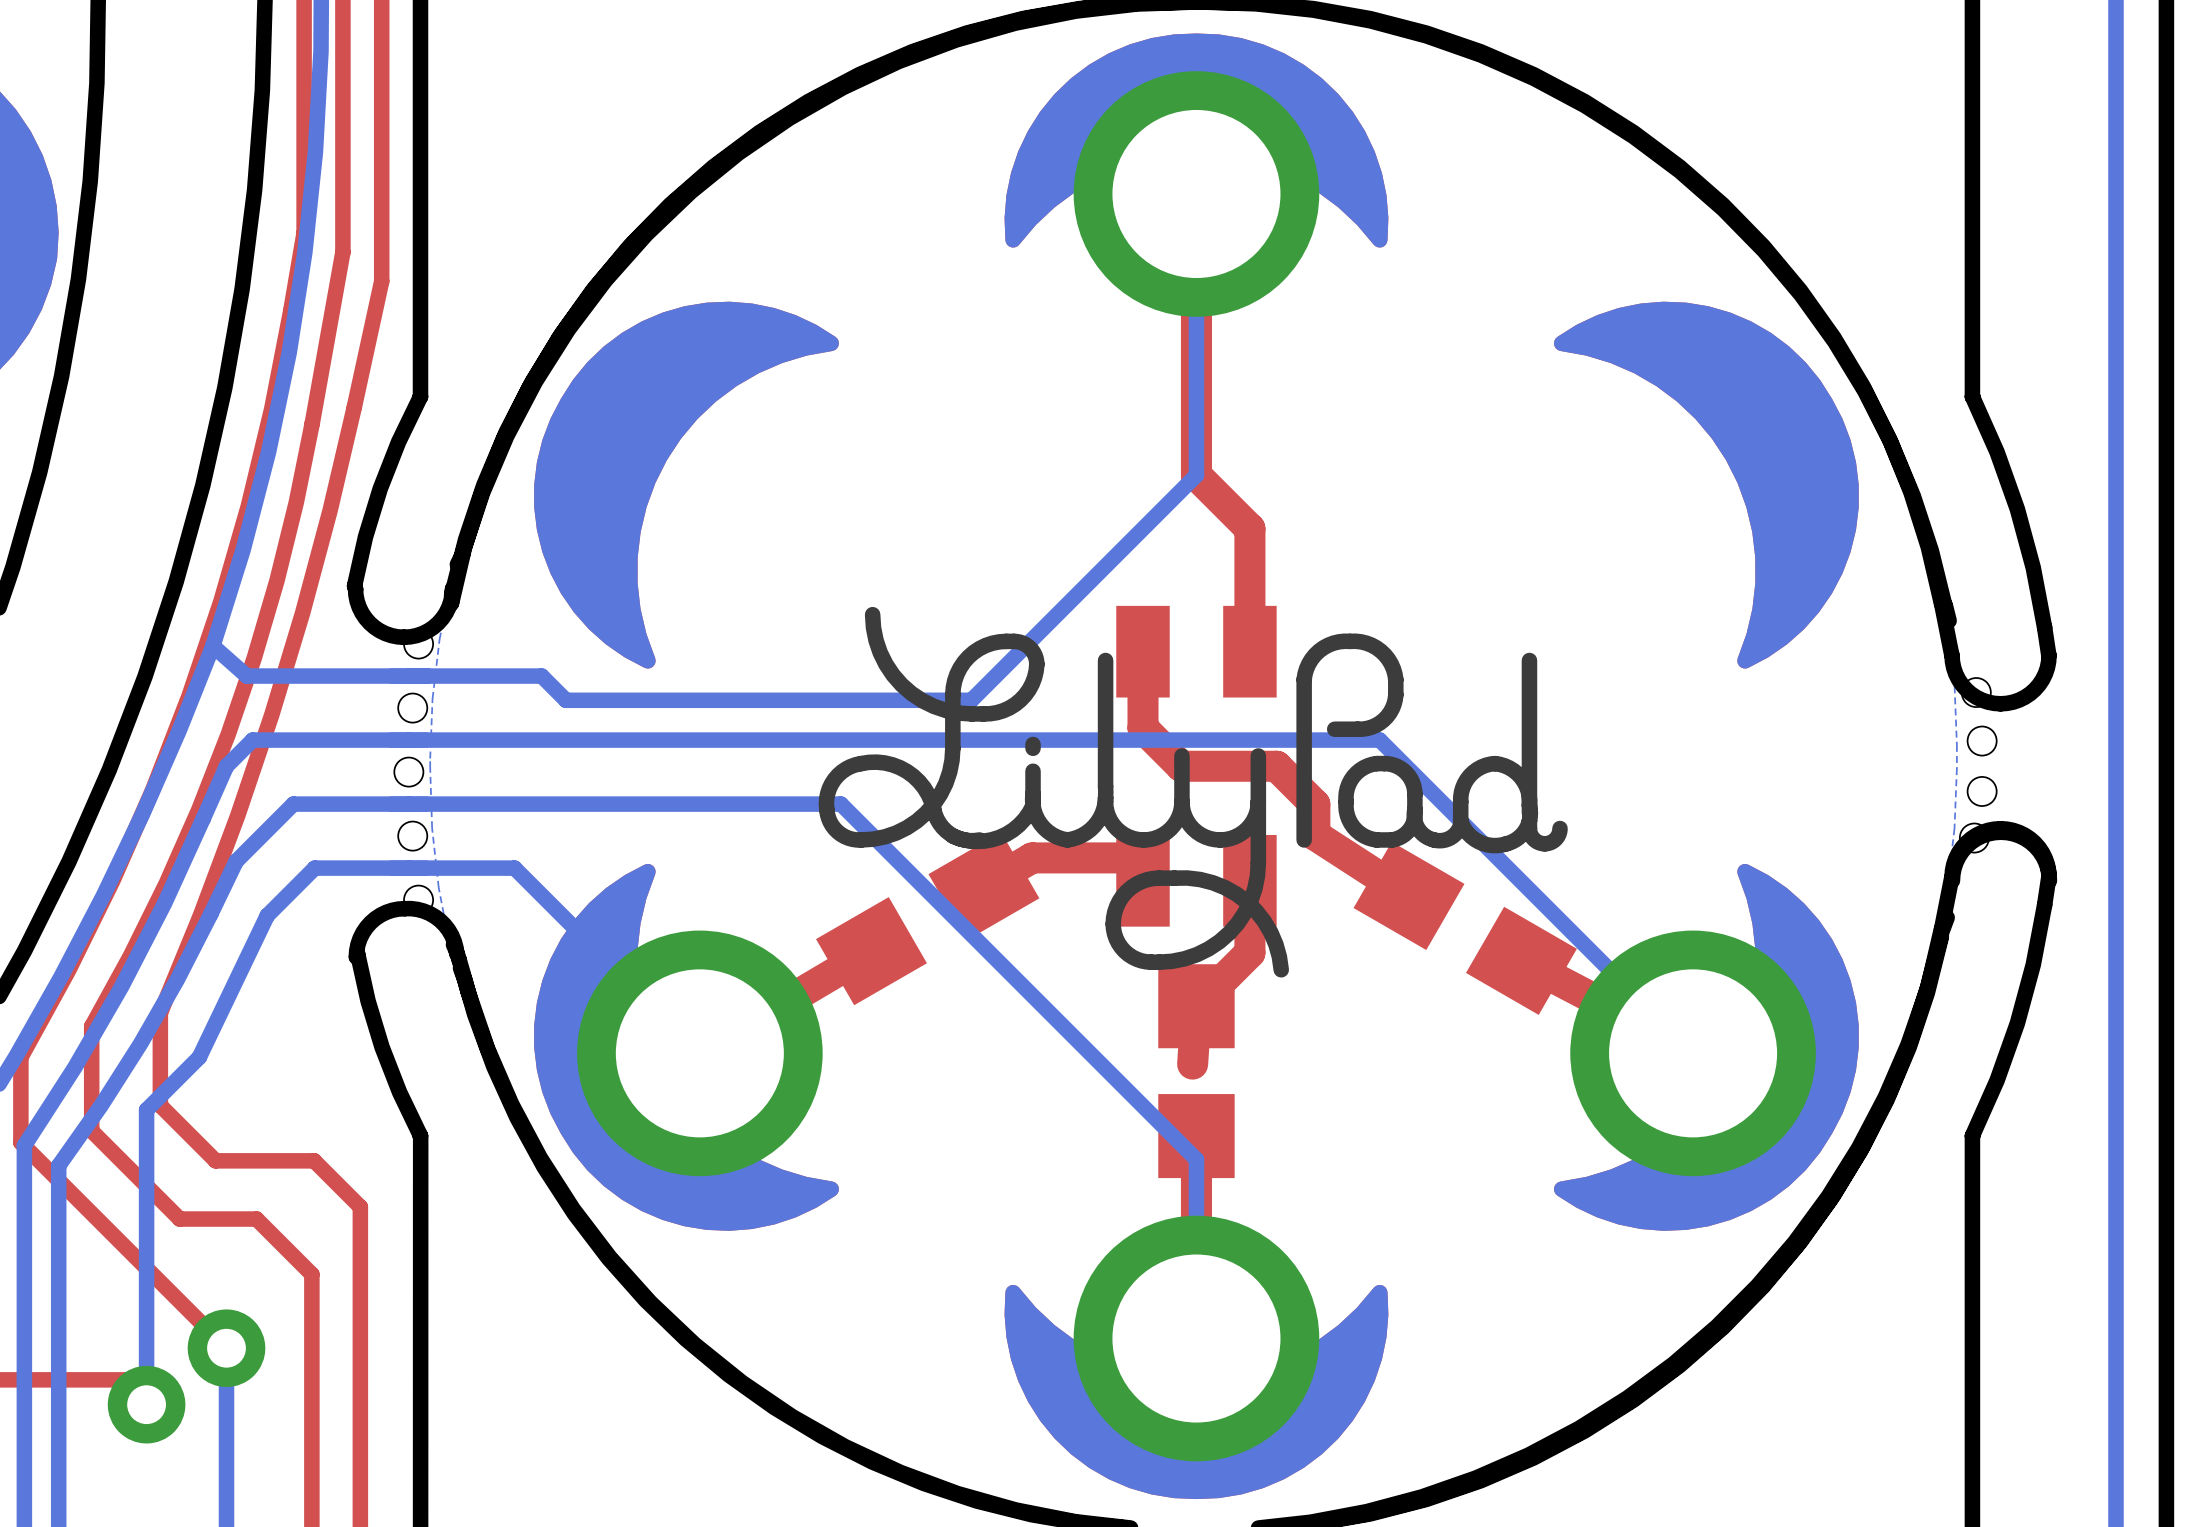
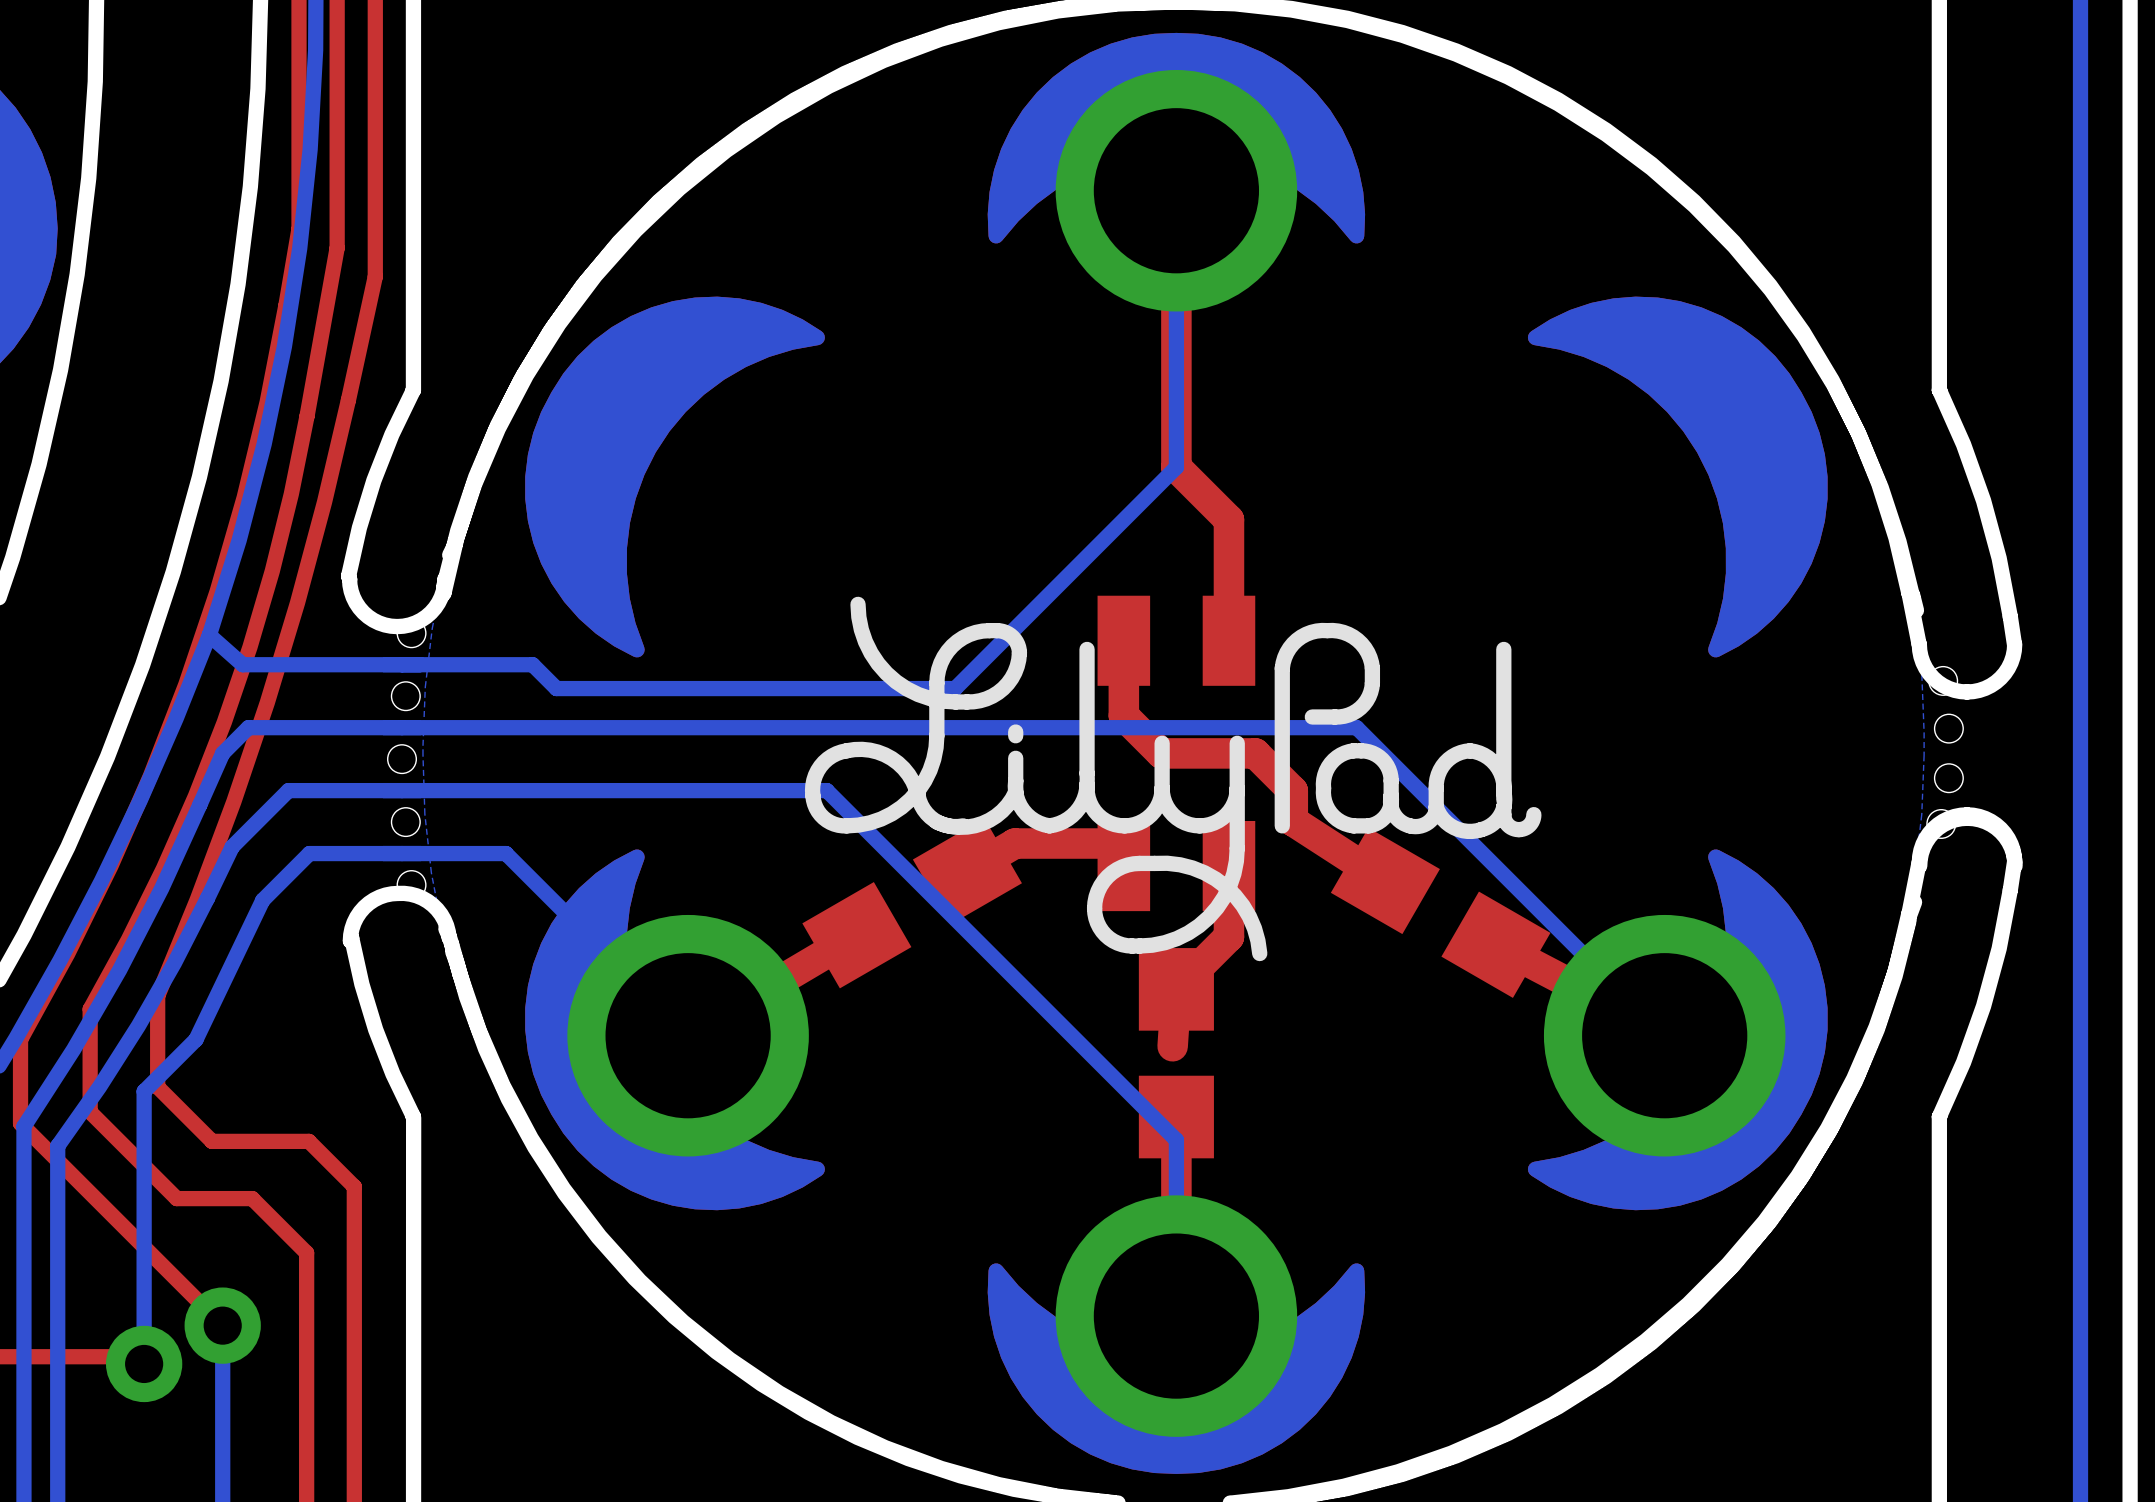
via position: (146, 1404) -> (144, 1363)

